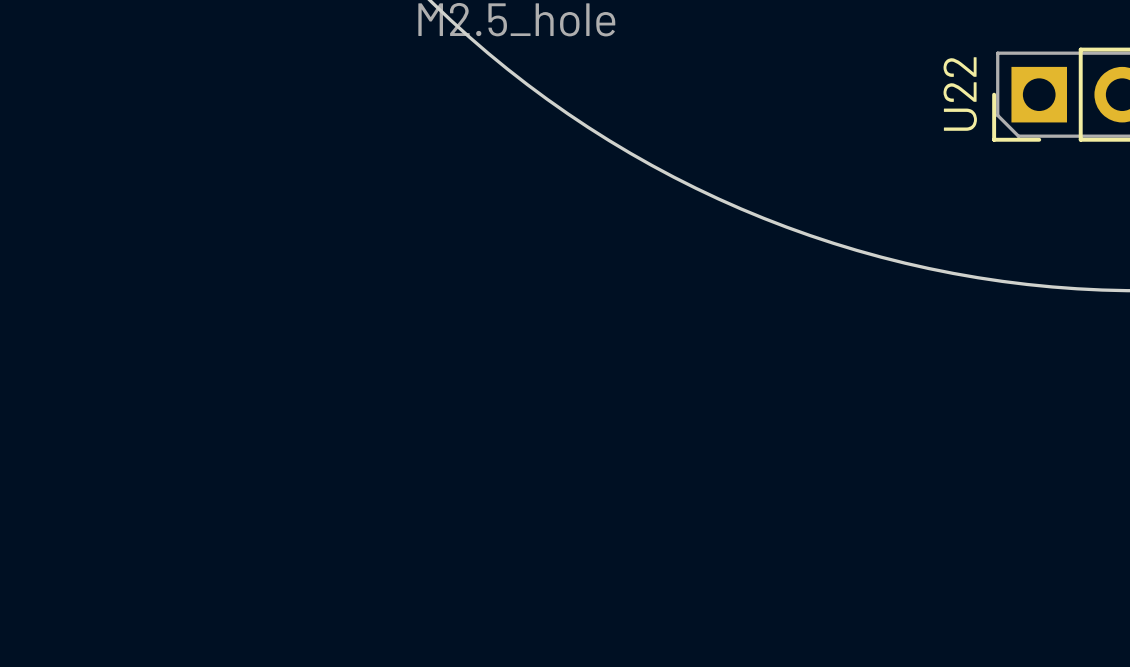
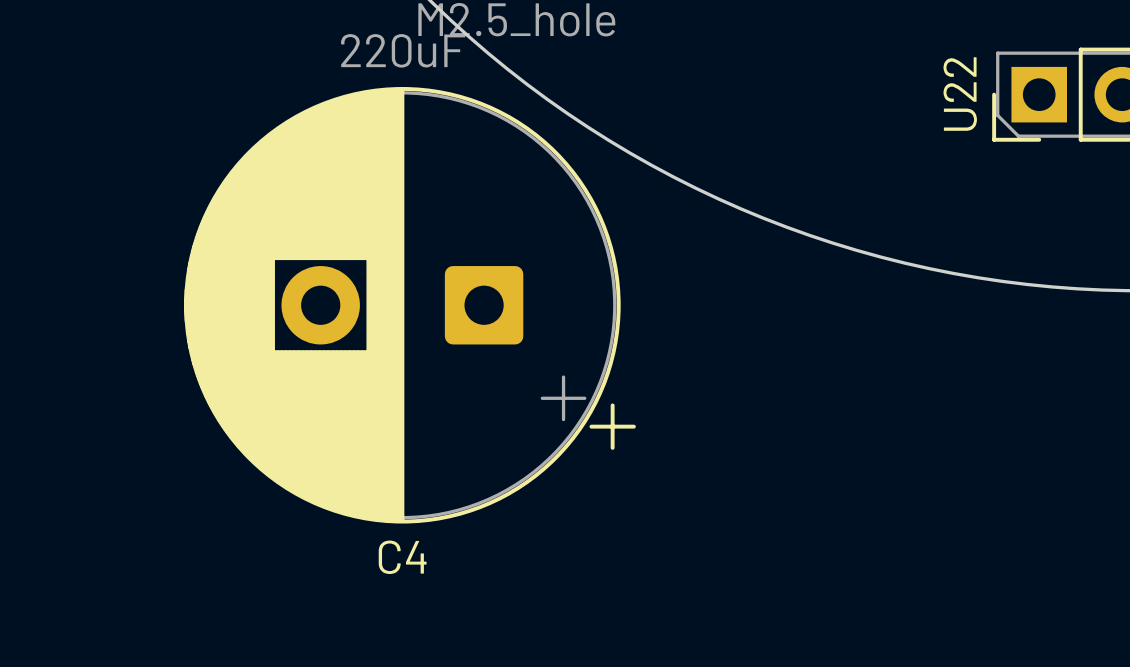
C4: none -> 220uF (409, 305)

